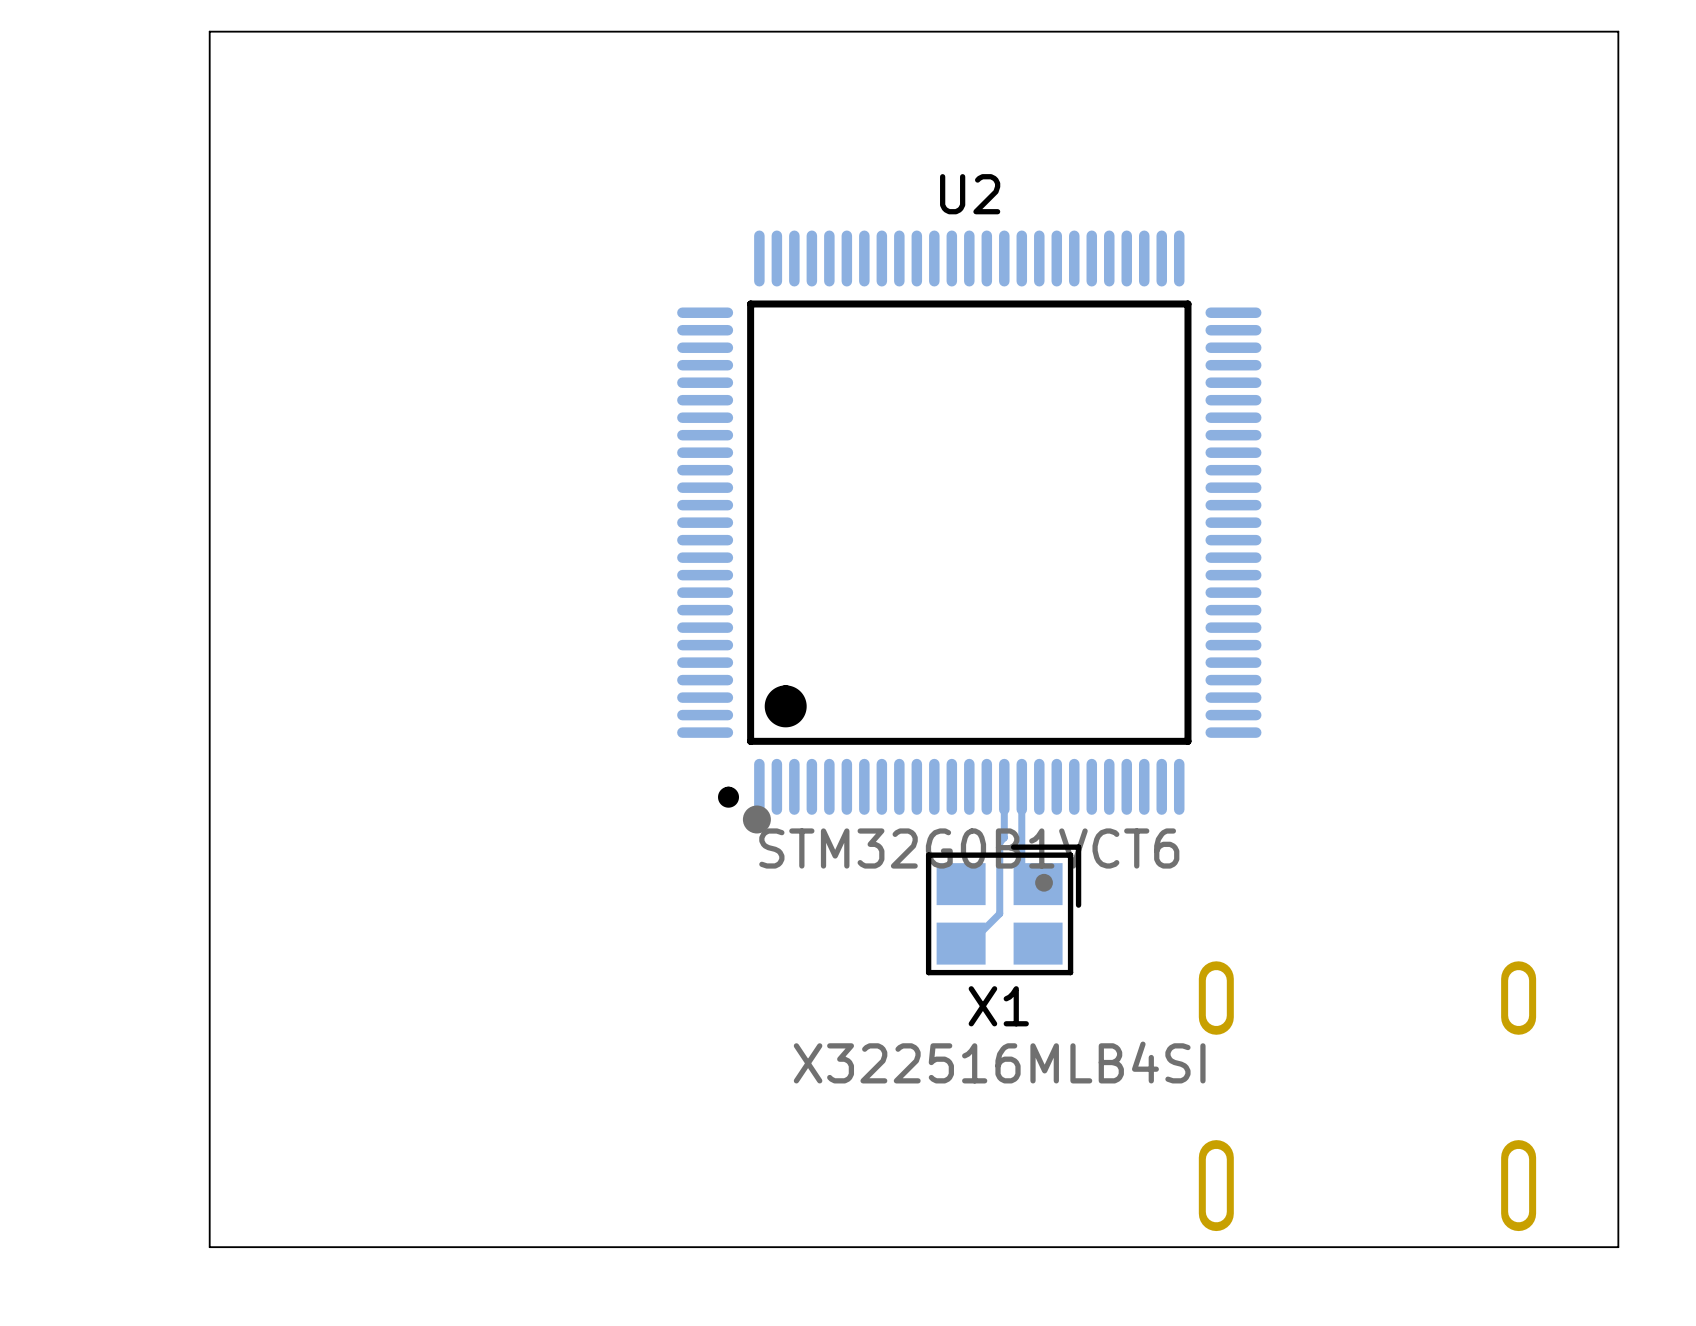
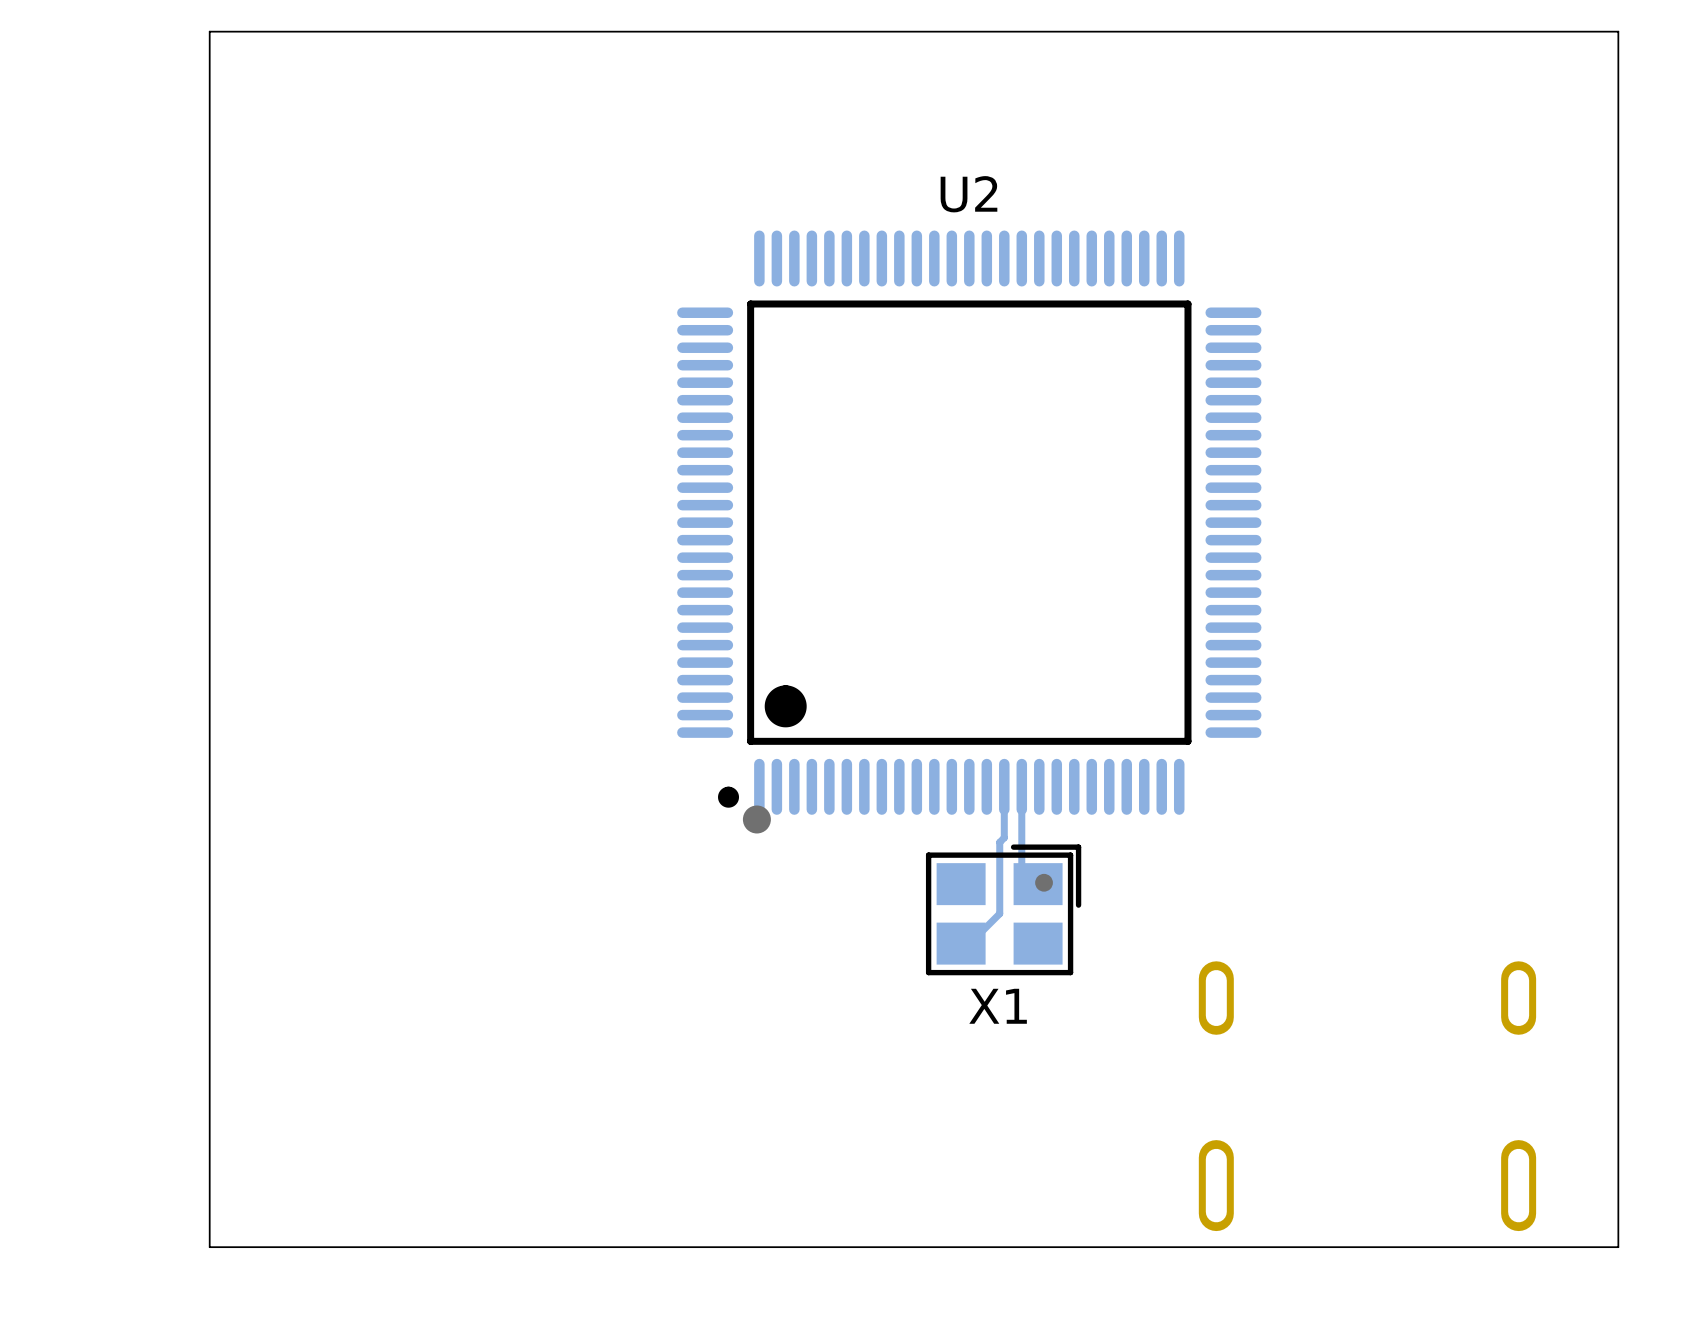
U2 value: STM32G0B1VCT6 (969, 848) -> none
X1 value: X322516MLB4SI (999, 1062) -> none

